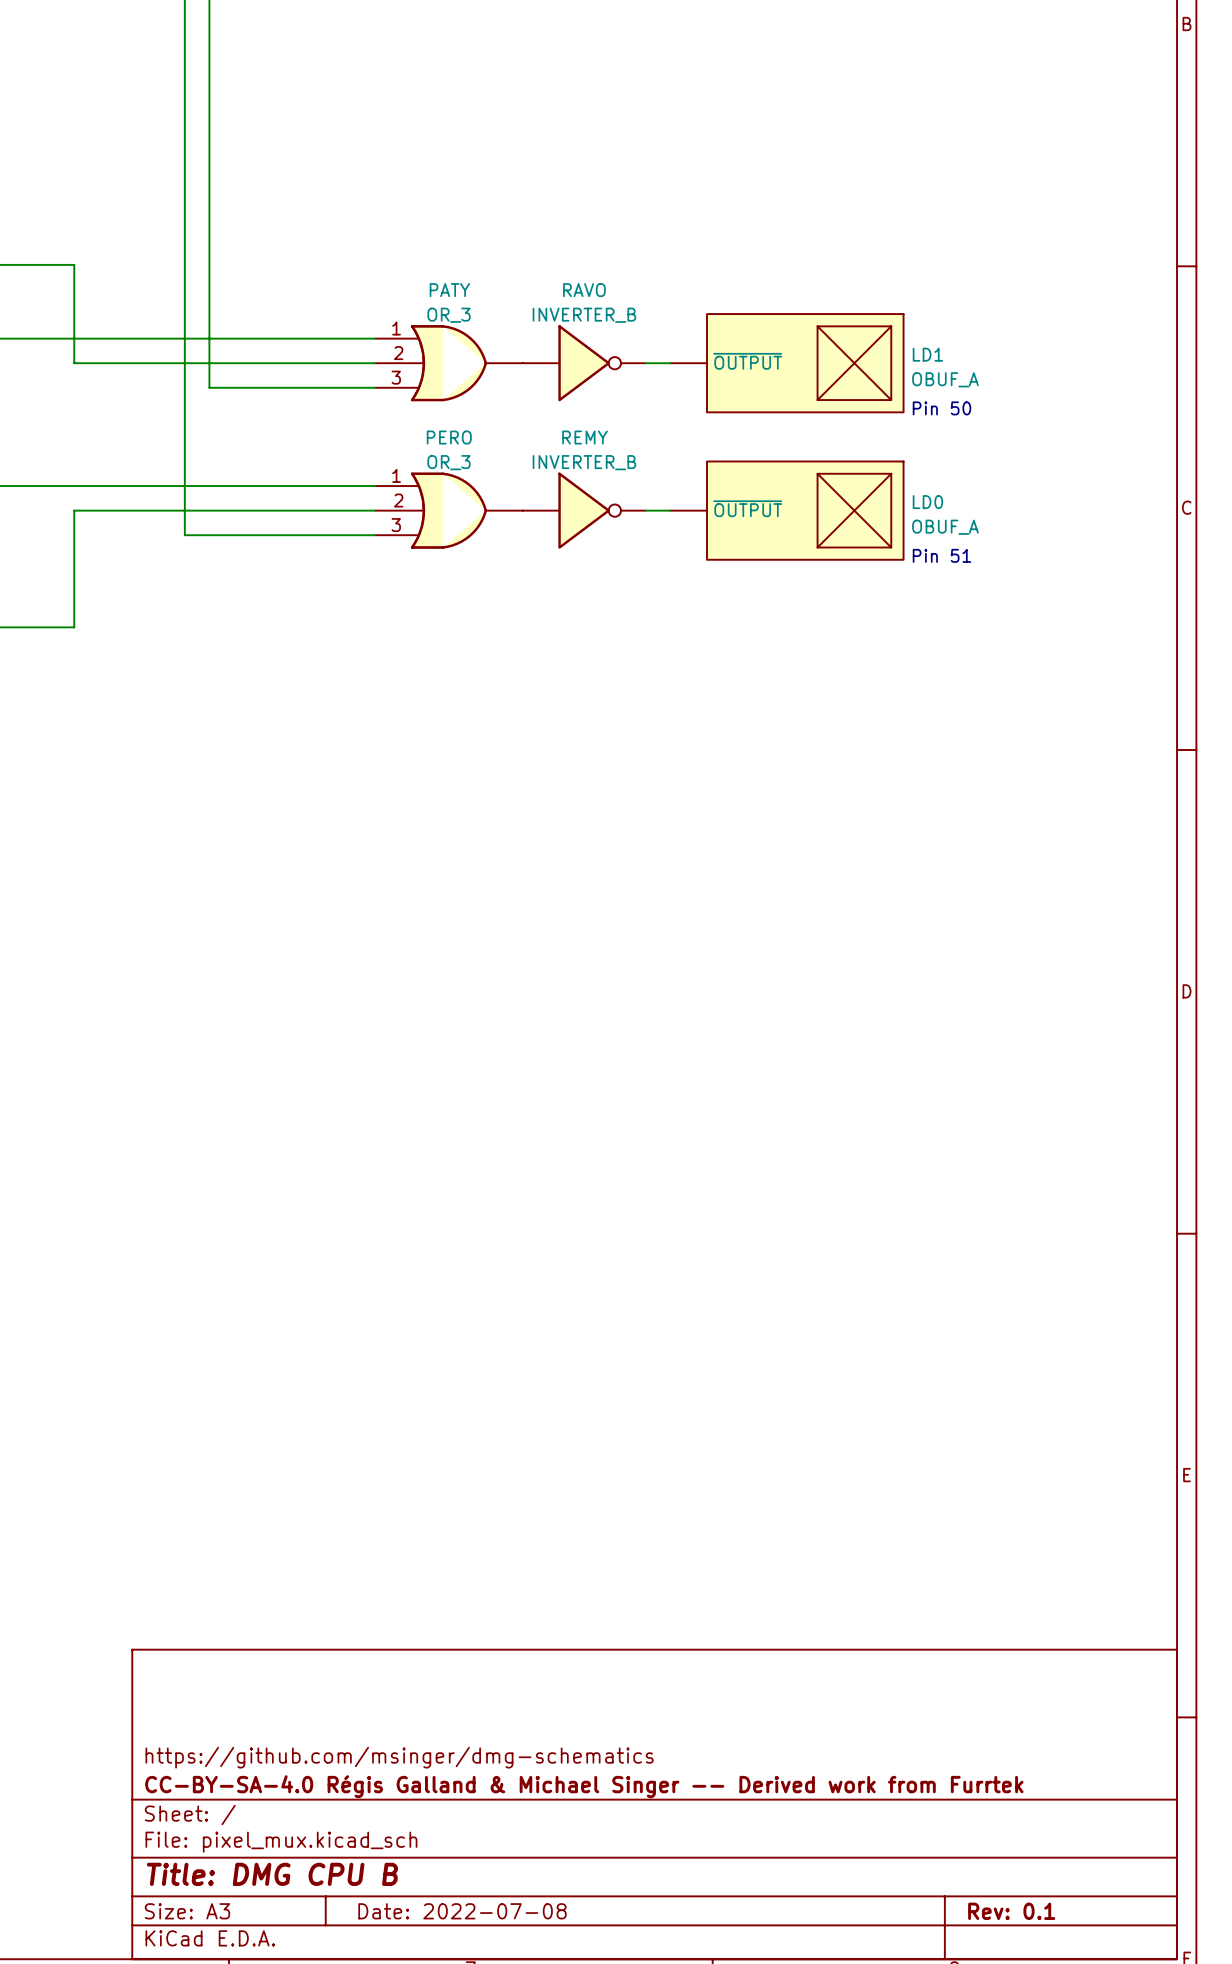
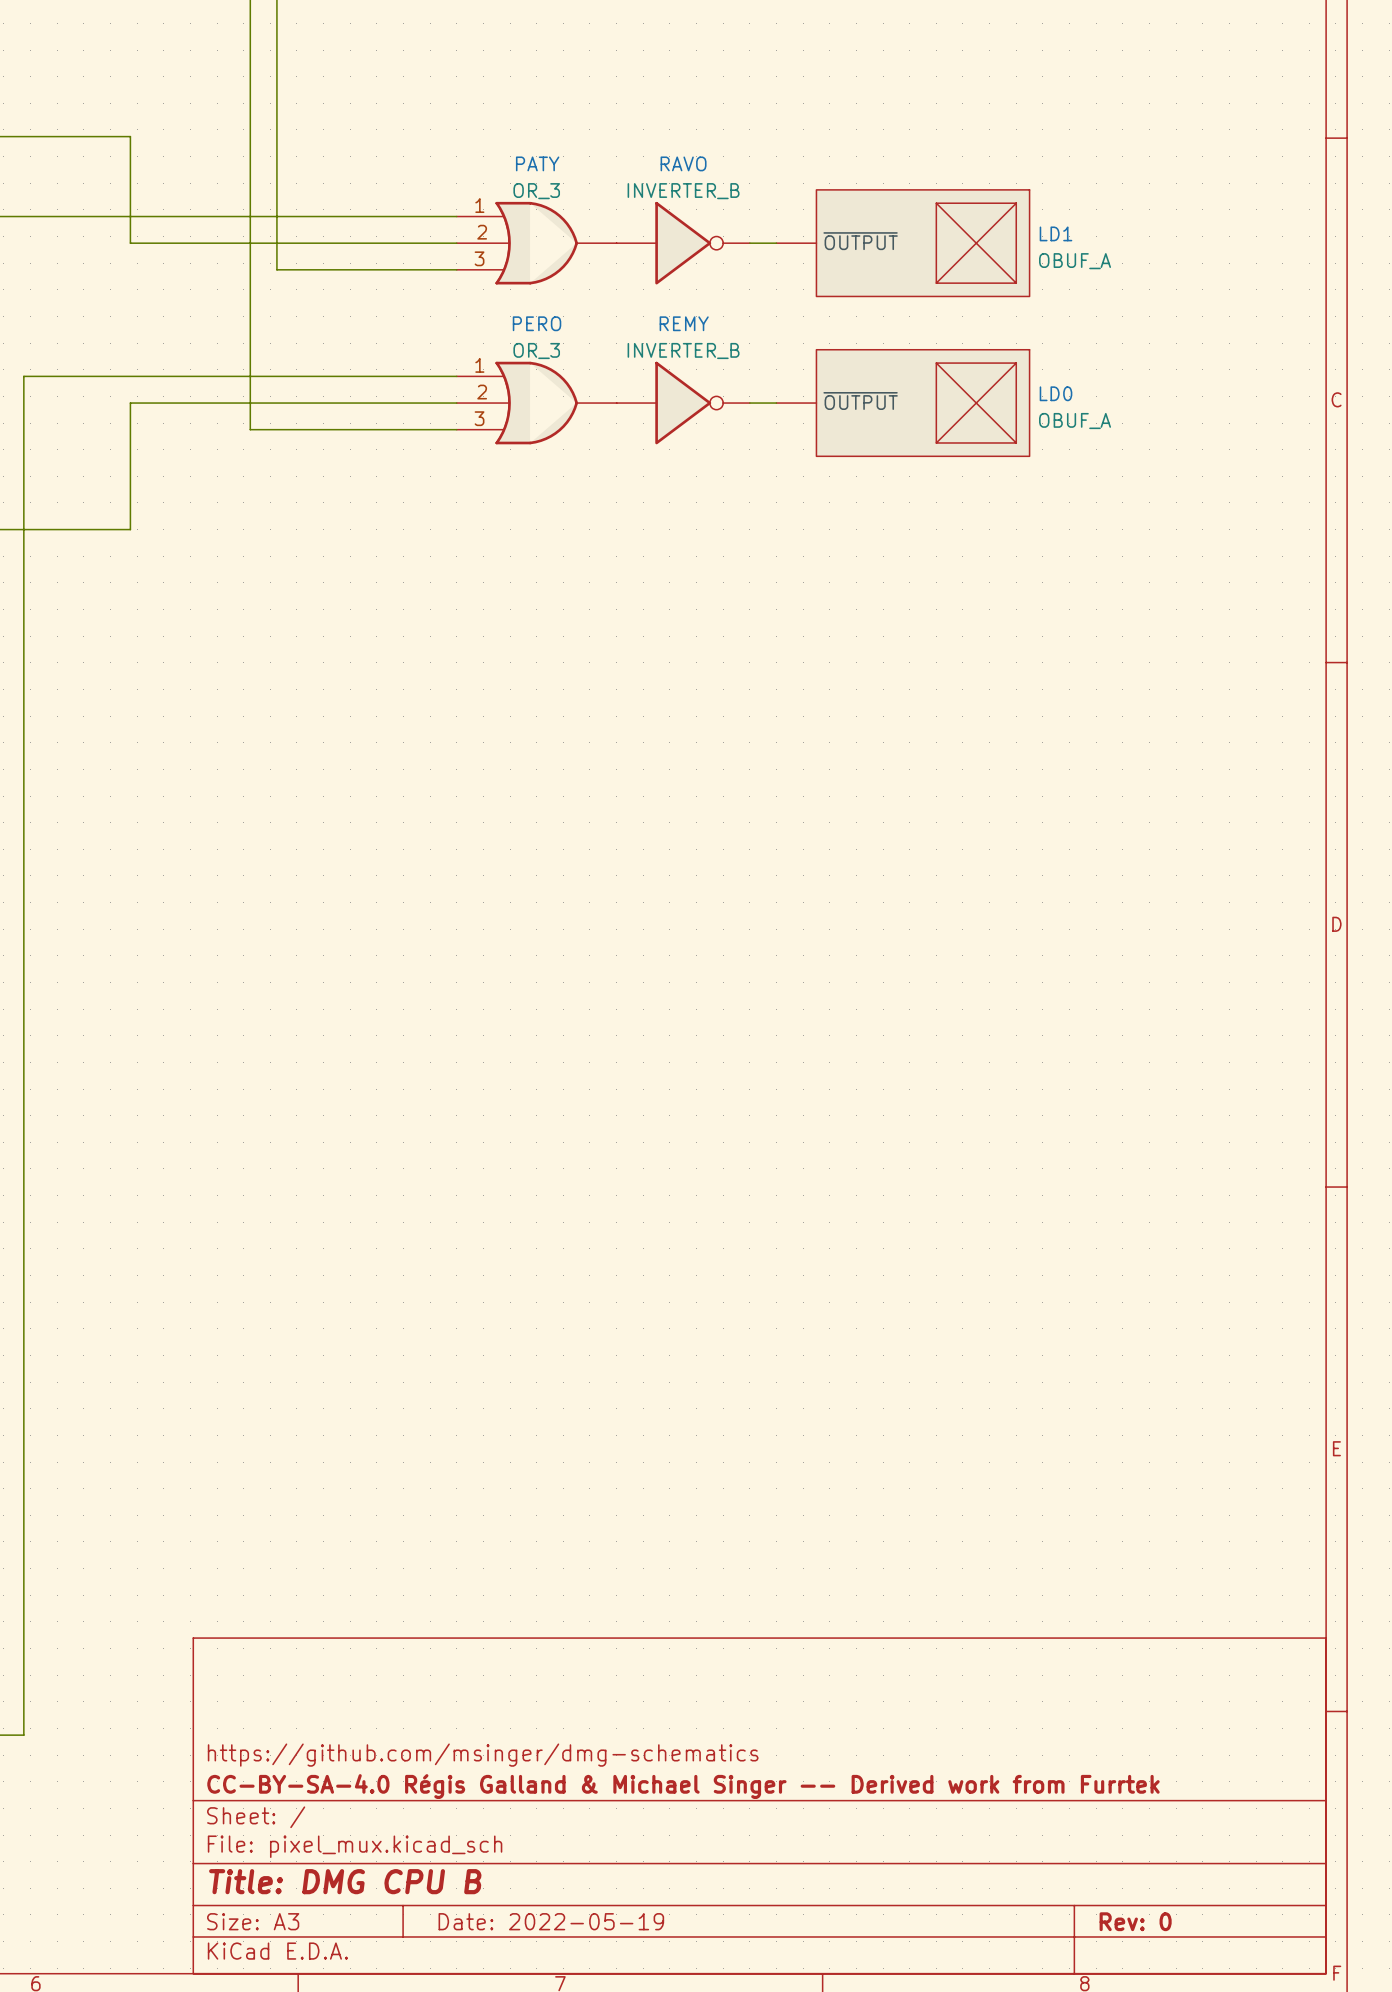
text: Pin 50 (941, 408) -> none
text: Pin 51 (941, 555) -> none
title block: Date: 2022-07-08 (462, 1911) -> Date: 2022-05-19 (551, 1921)
title block: Rev: 0.1 (1011, 1911) -> Rev: 0 (1135, 1921)

